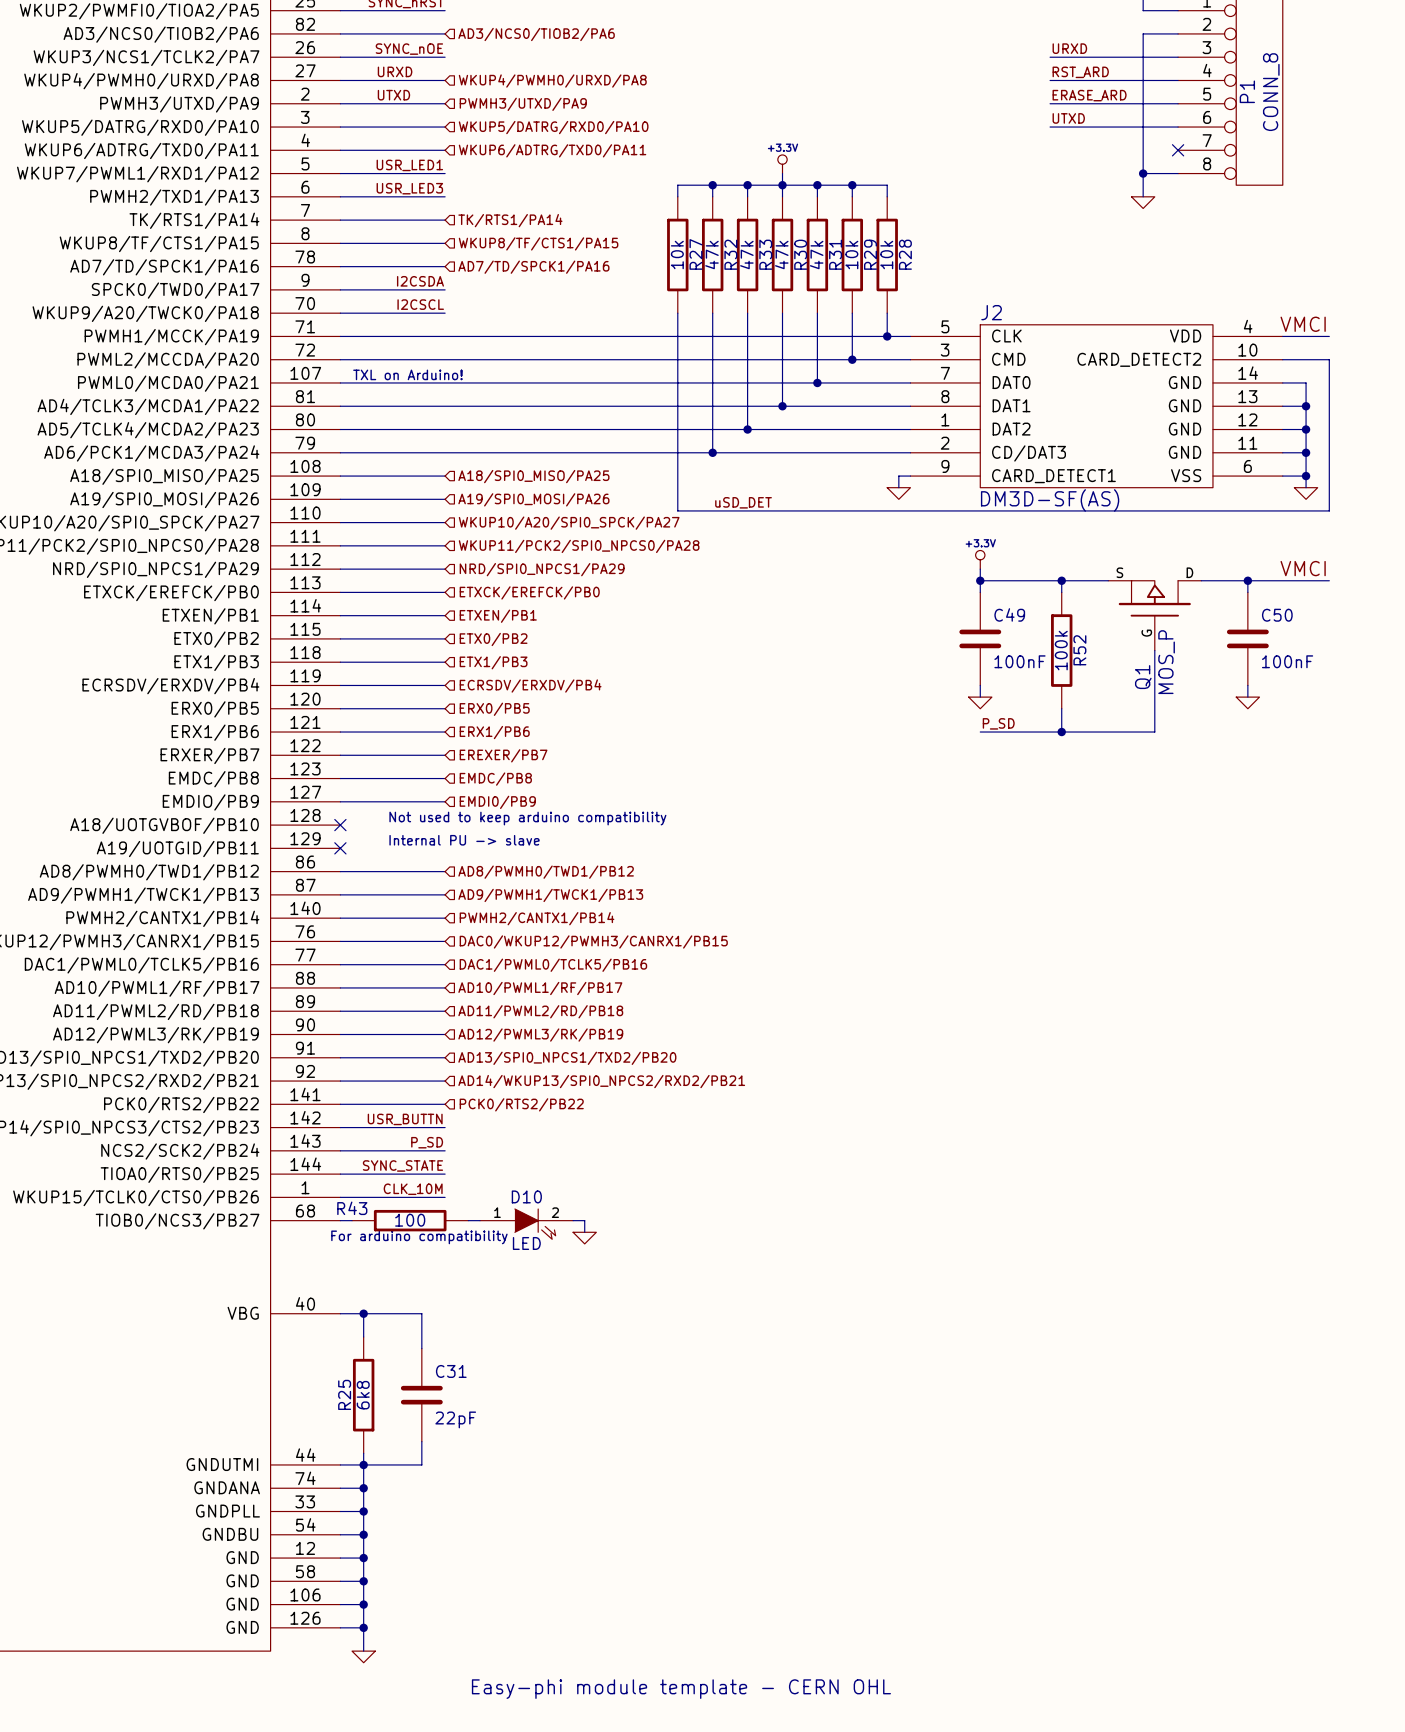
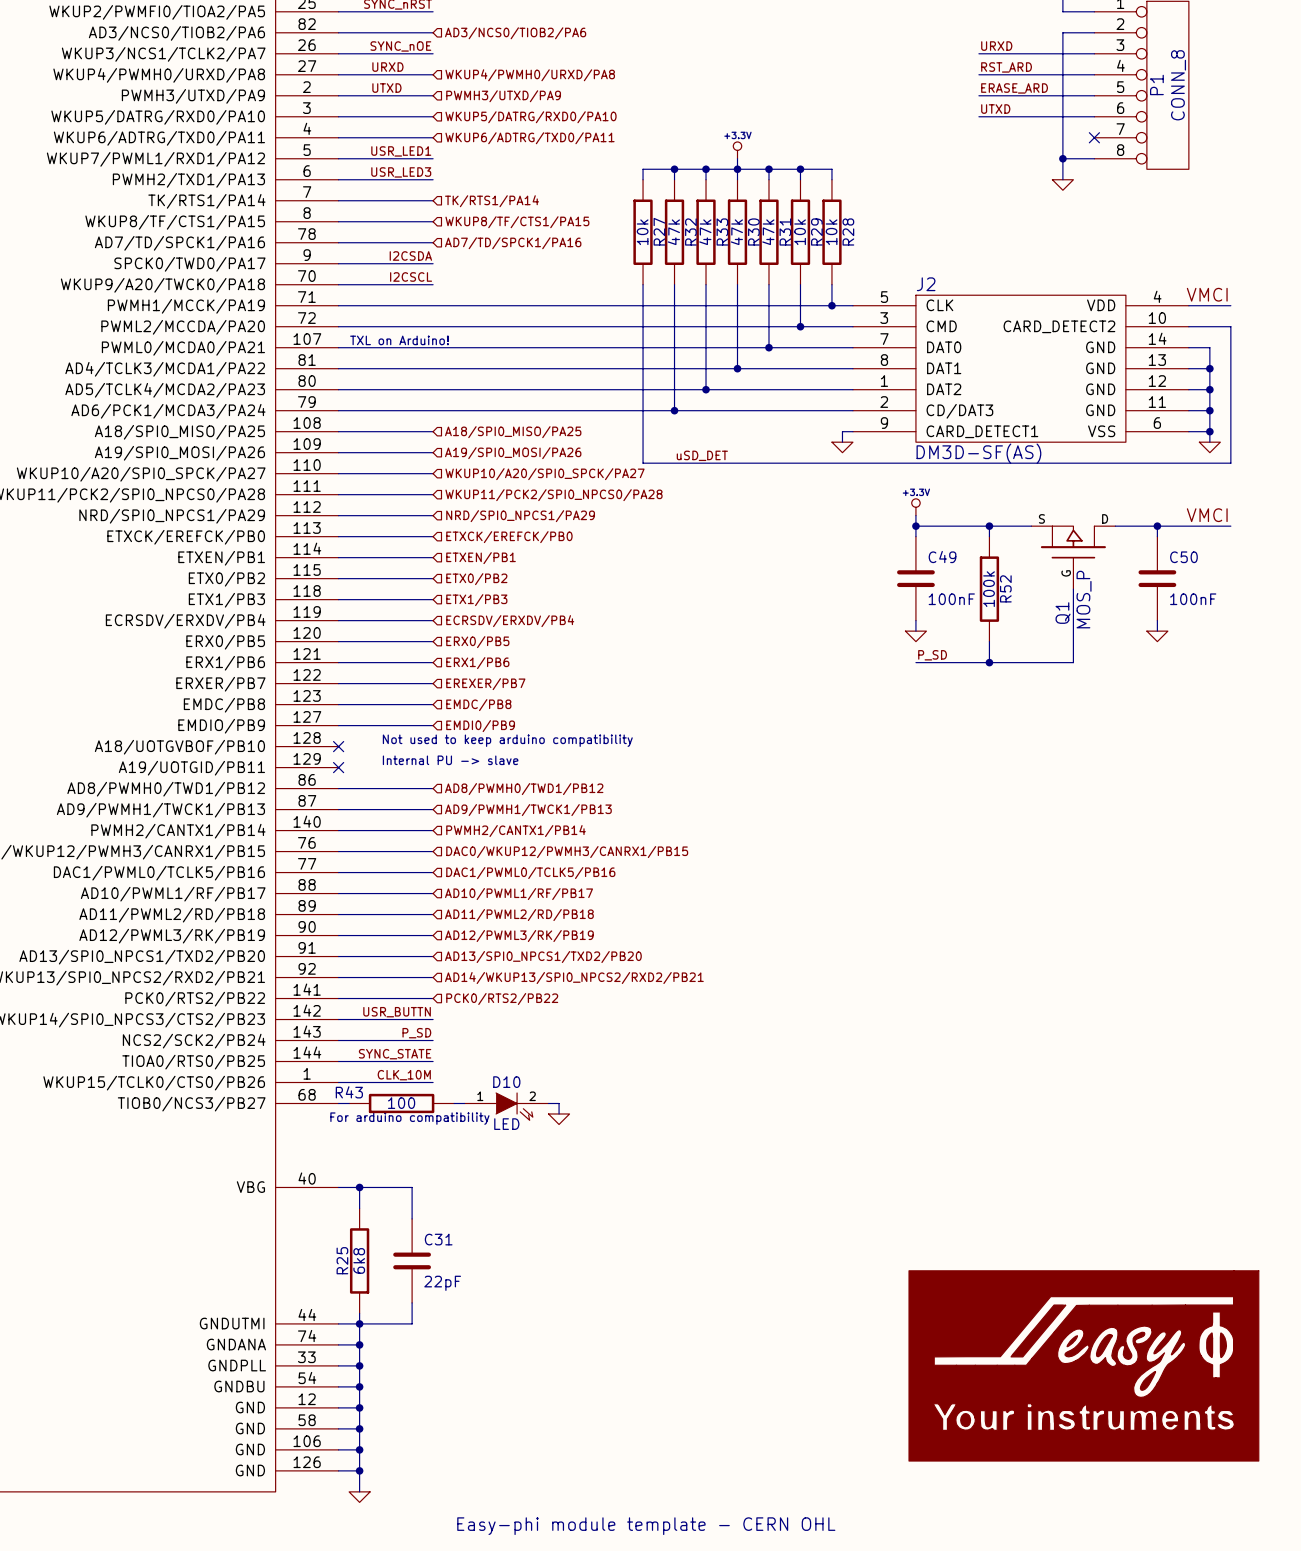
power symbol: none -> (1083, 1365)

